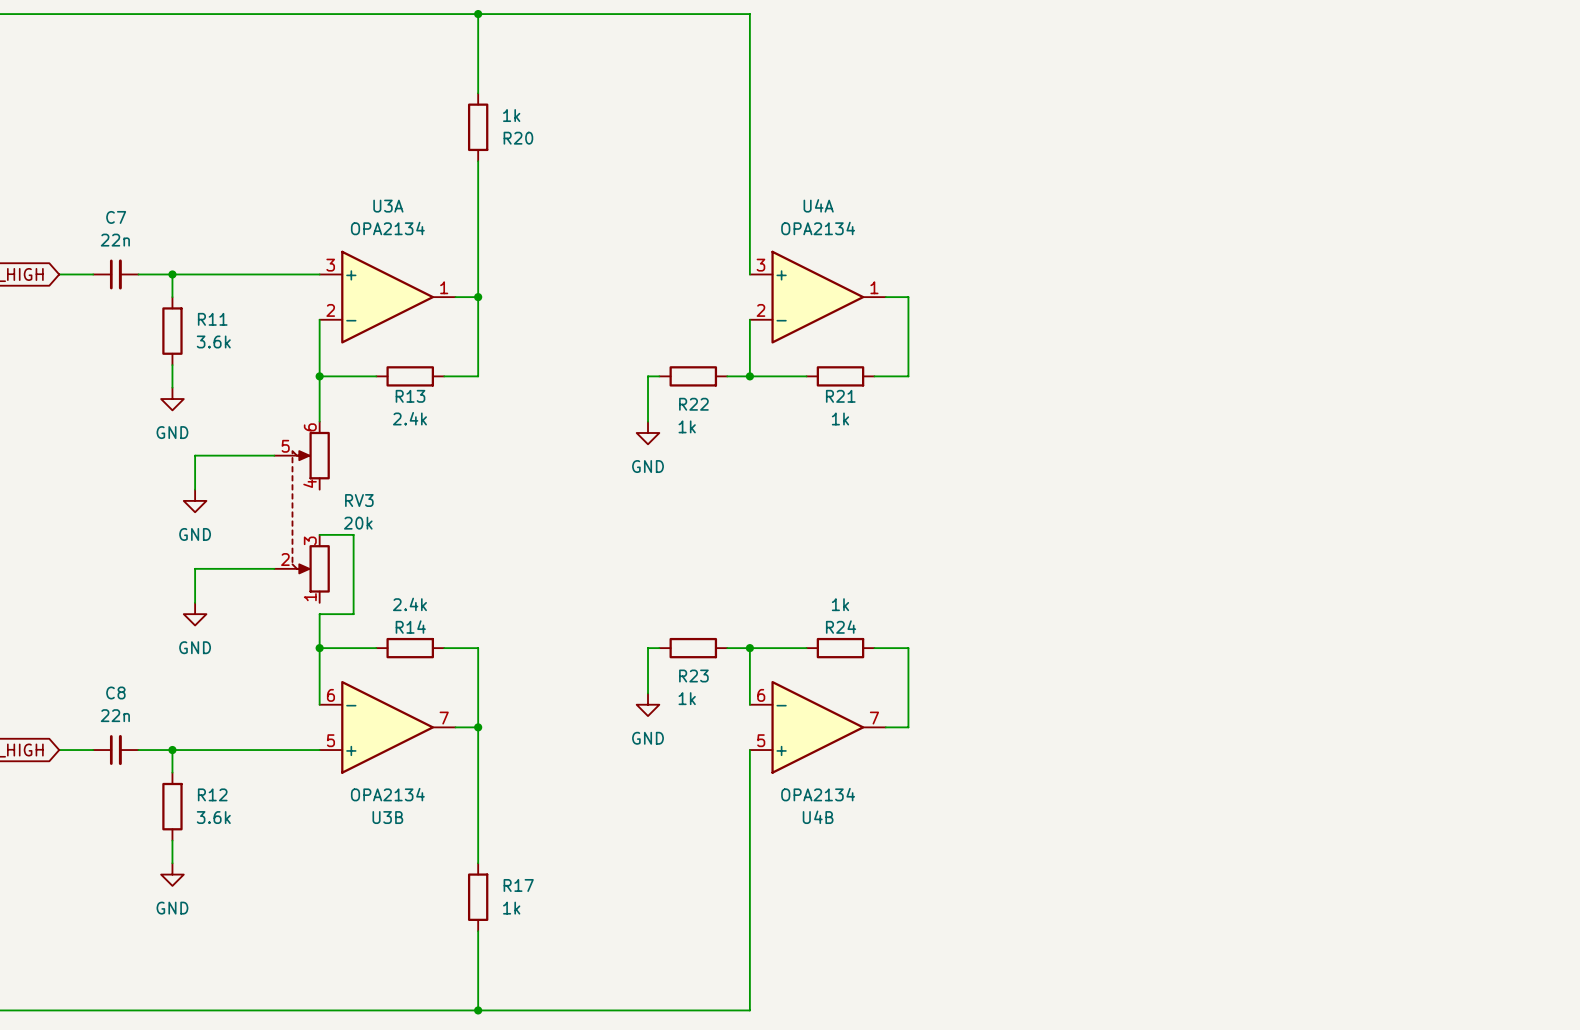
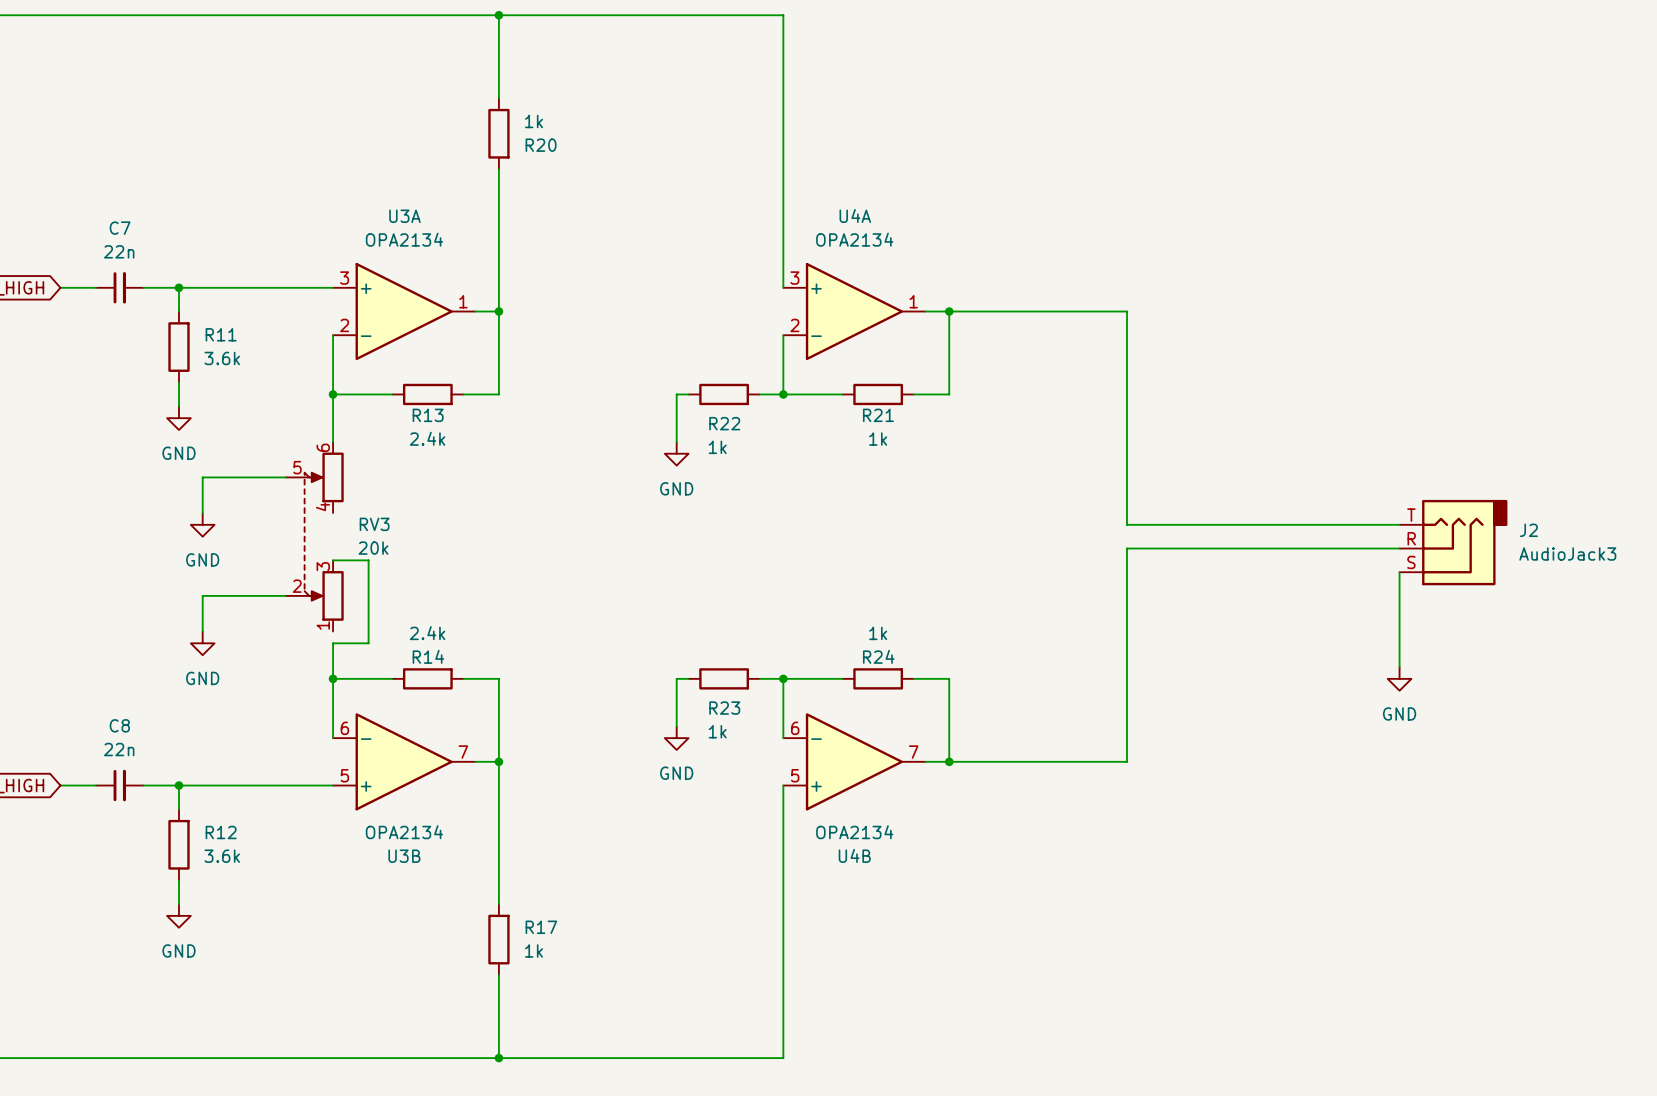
wire: none -> (949, 311) (1127, 311) (1127, 524) (1399, 524)
junction: none -> (949, 311)
J2: none -> AudioJack3 (1453, 542)
wire: none -> (1399, 548) (1127, 548) (1127, 761) (949, 761)
wire: none -> (1399, 572) (1399, 667)
power symbol: none -> GND (1399, 678)
junction: none -> (949, 761)

